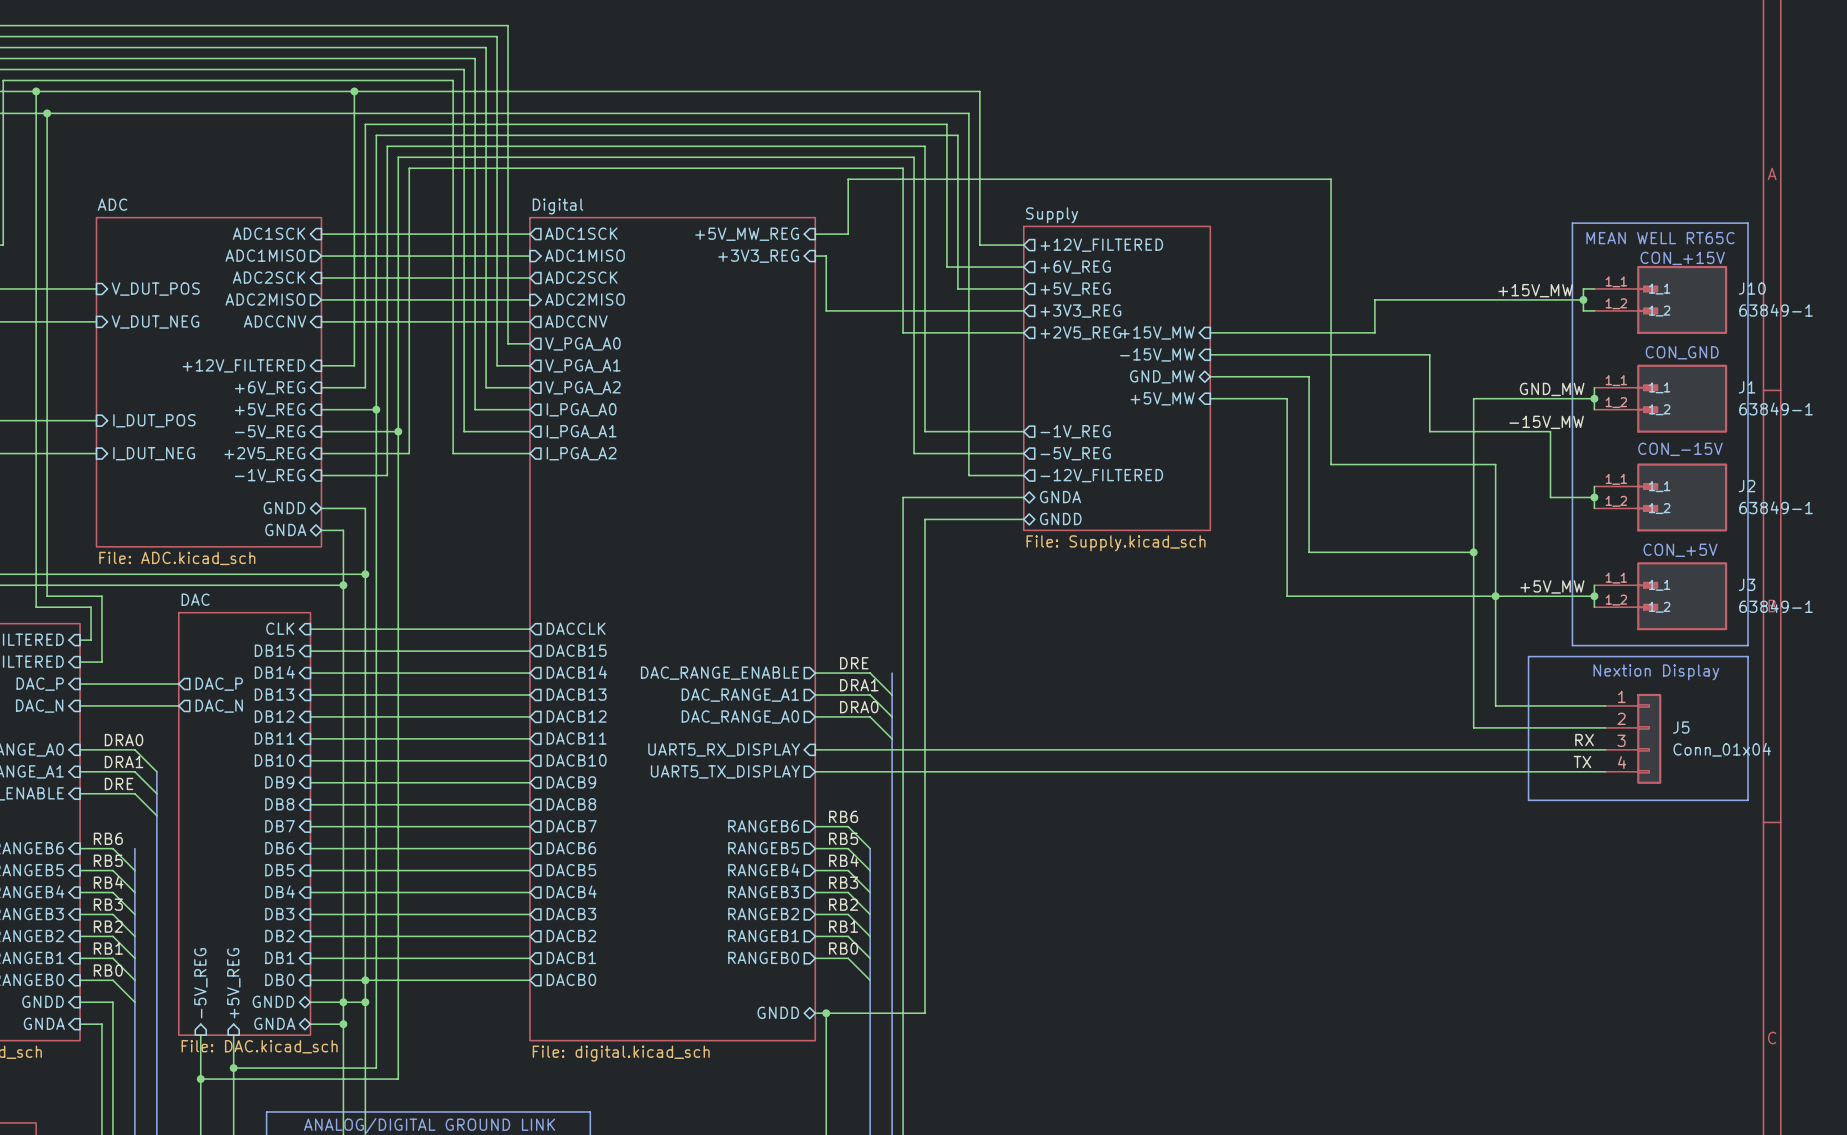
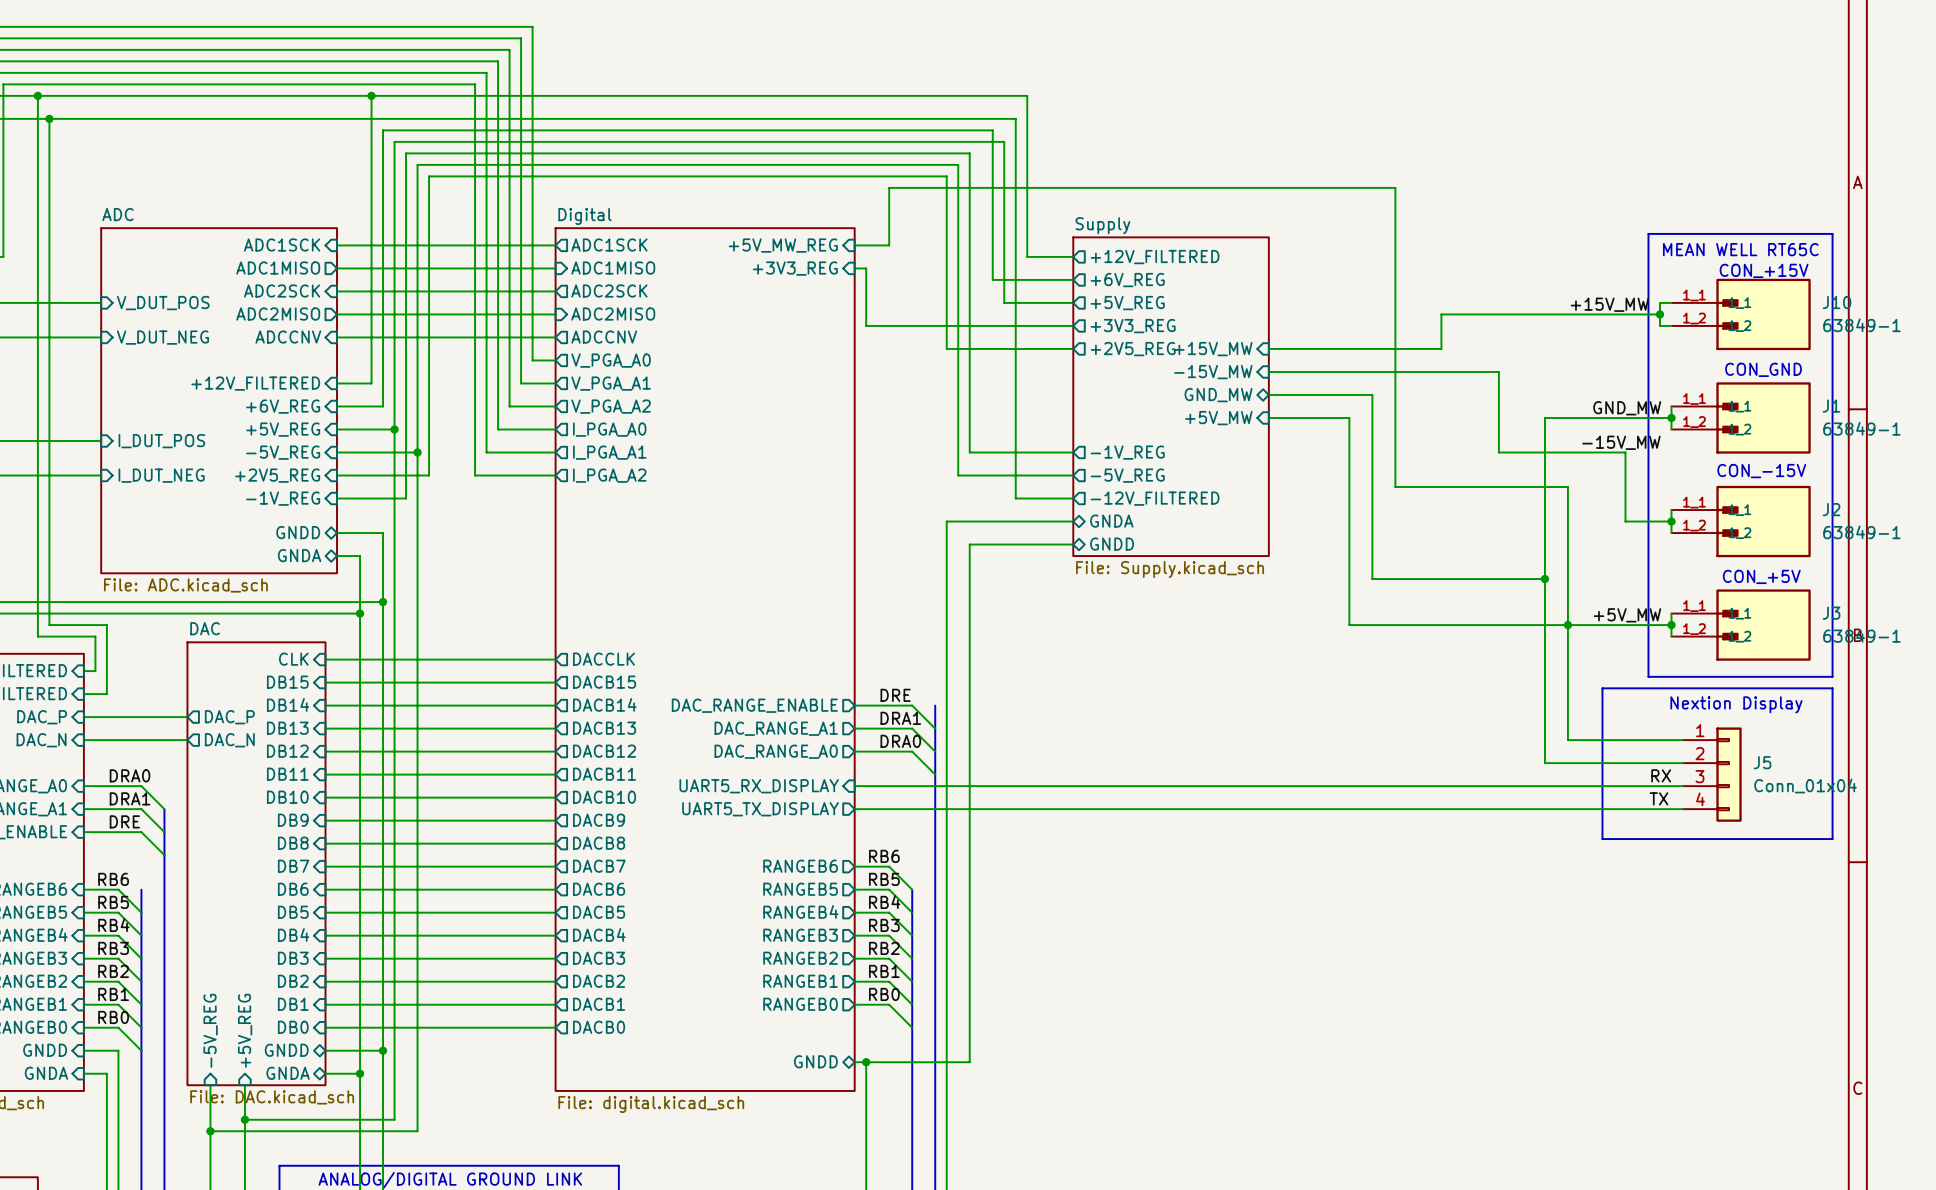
junction: (365, 980) -> none
junction: (343, 1002) -> none

